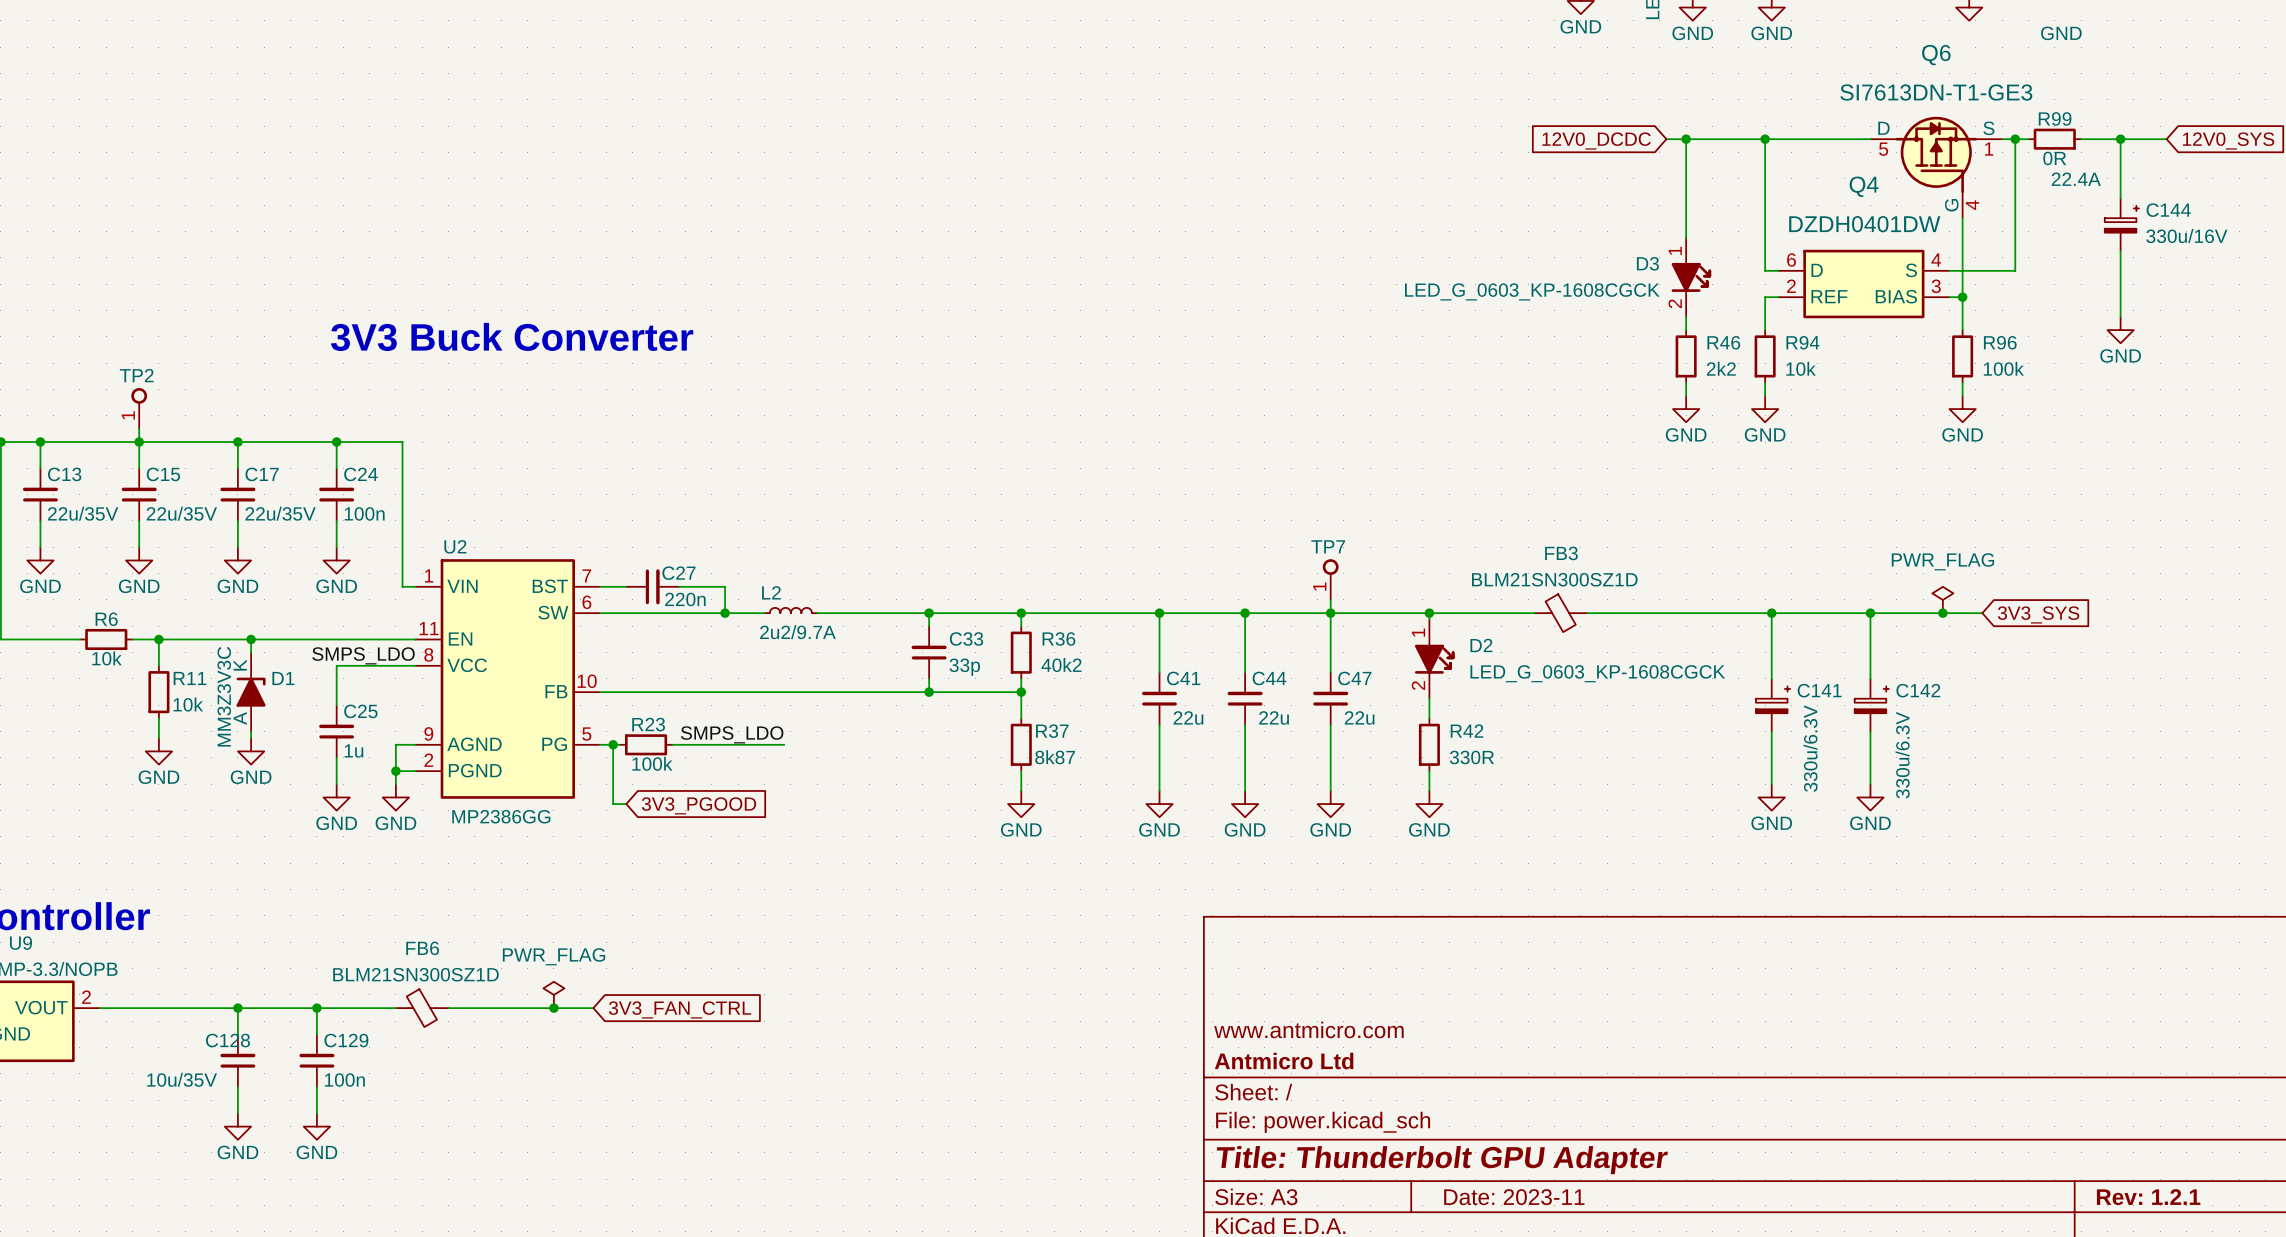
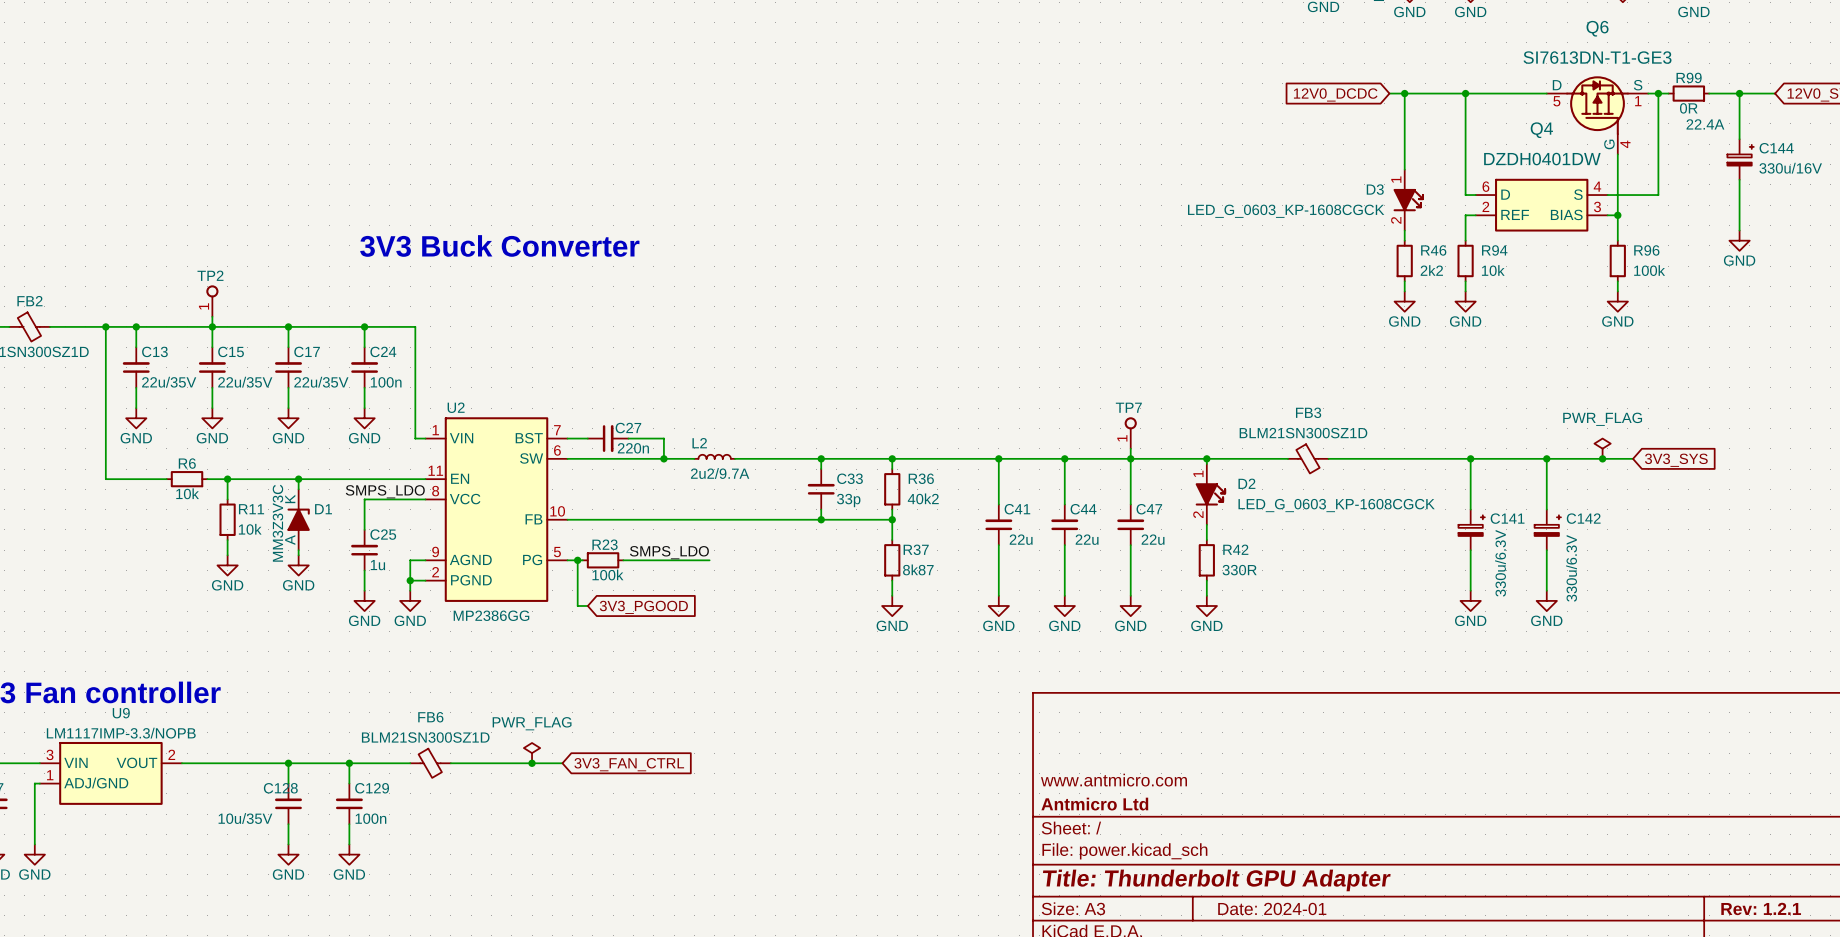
title block: Date: 2023-11 (1514, 1197) -> Date: 2024-01 (1272, 908)

